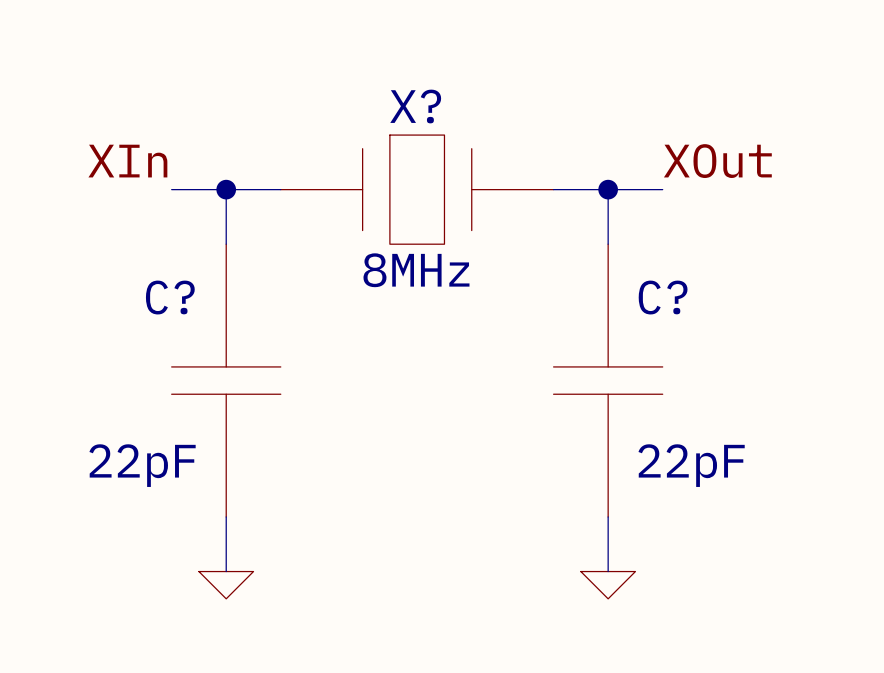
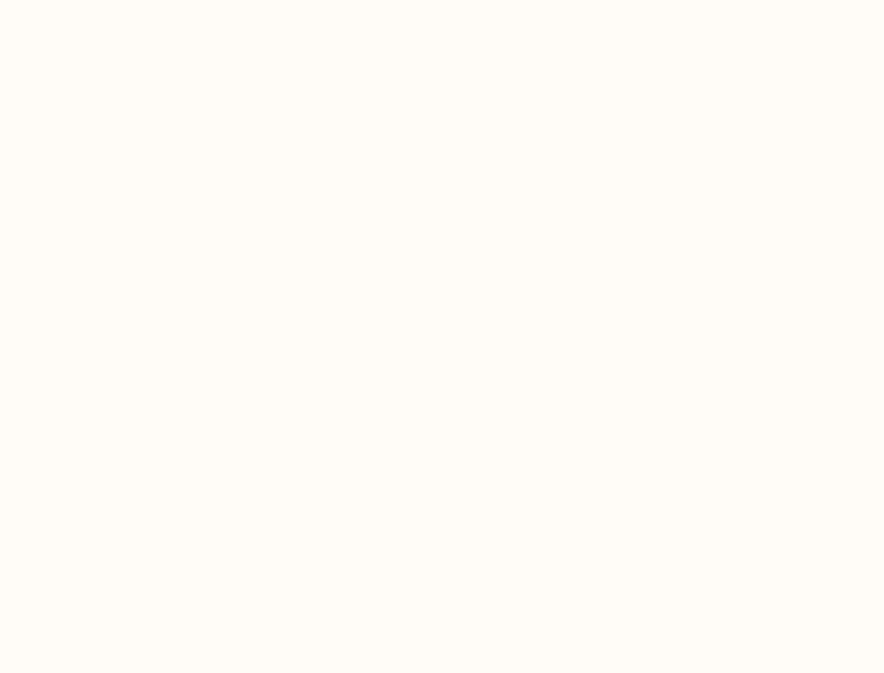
label: XIn (127, 161) -> none
label: XOut (717, 161) -> none
wire: (171, 189) (280, 189) -> none
wire: (226, 189) (226, 244) -> none
junction: (226, 189) -> none
X?: 8MHz (417, 189) -> none
wire: (553, 189) (662, 189) -> none
wire: (608, 189) (608, 244) -> none
junction: (608, 189) -> none
C?: 22pF (226, 380) -> none
C?: 22pF (608, 380) -> none
wire: (226, 516) (226, 571) -> none
wire: (608, 516) (608, 571) -> none
power symbol: (226, 585) -> none
power symbol: (608, 585) -> none

